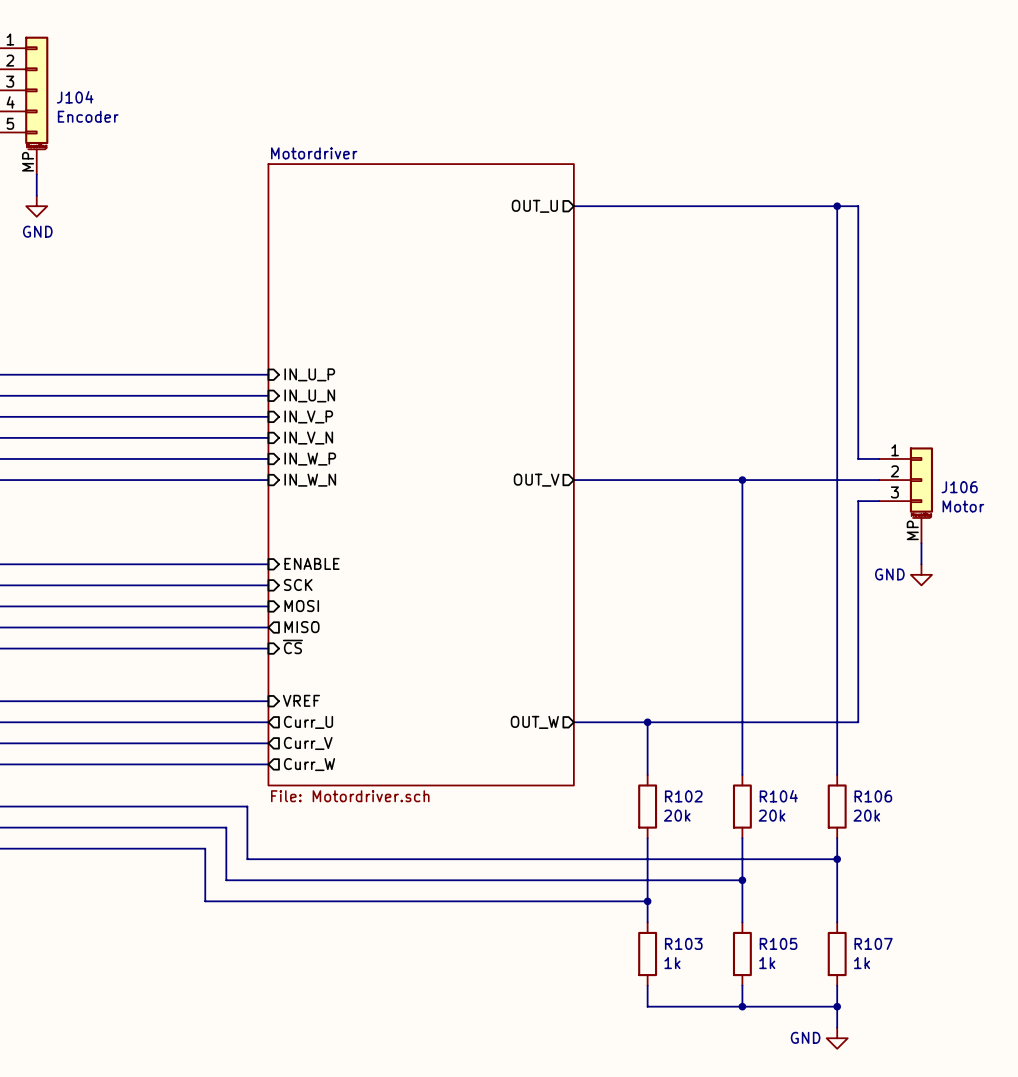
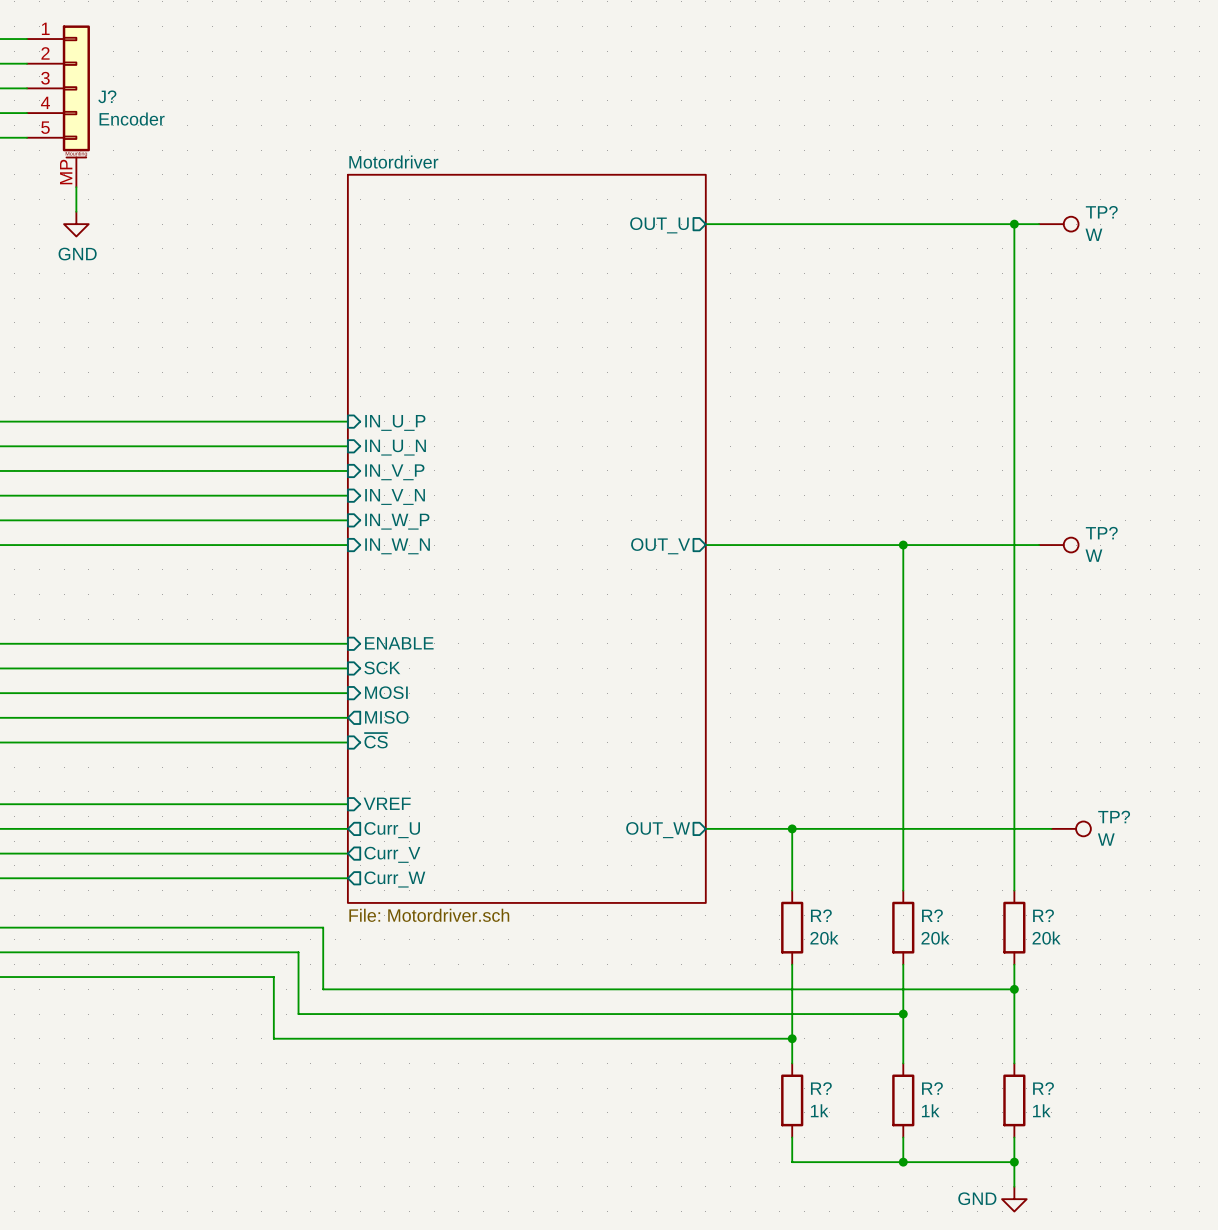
J104 name: J104 (75, 97) -> J? (107, 96)
wire: (858, 206) (858, 458) (879, 458) -> none
TP?: none -> W (1058, 224)
TP?: none -> W (1058, 545)
J106: Motor (906, 495) -> none
wire: (879, 501) (858, 501) (858, 722) -> (1051, 828) (1039, 828)
wire: (921, 543) (921, 564) -> none
power symbol: GND (921, 574) -> none
TP?: none -> W (1071, 828)
R102 name: R102 (683, 796) -> R? (821, 915)
R104 name: R104 (778, 796) -> R? (932, 915)
R106 name: R106 (873, 796) -> R? (1043, 915)
R103 name: R103 (683, 943) -> R? (821, 1088)
R105 name: R105 (778, 943) -> R? (932, 1088)
R107 name: R107 (873, 943) -> R? (1043, 1088)

